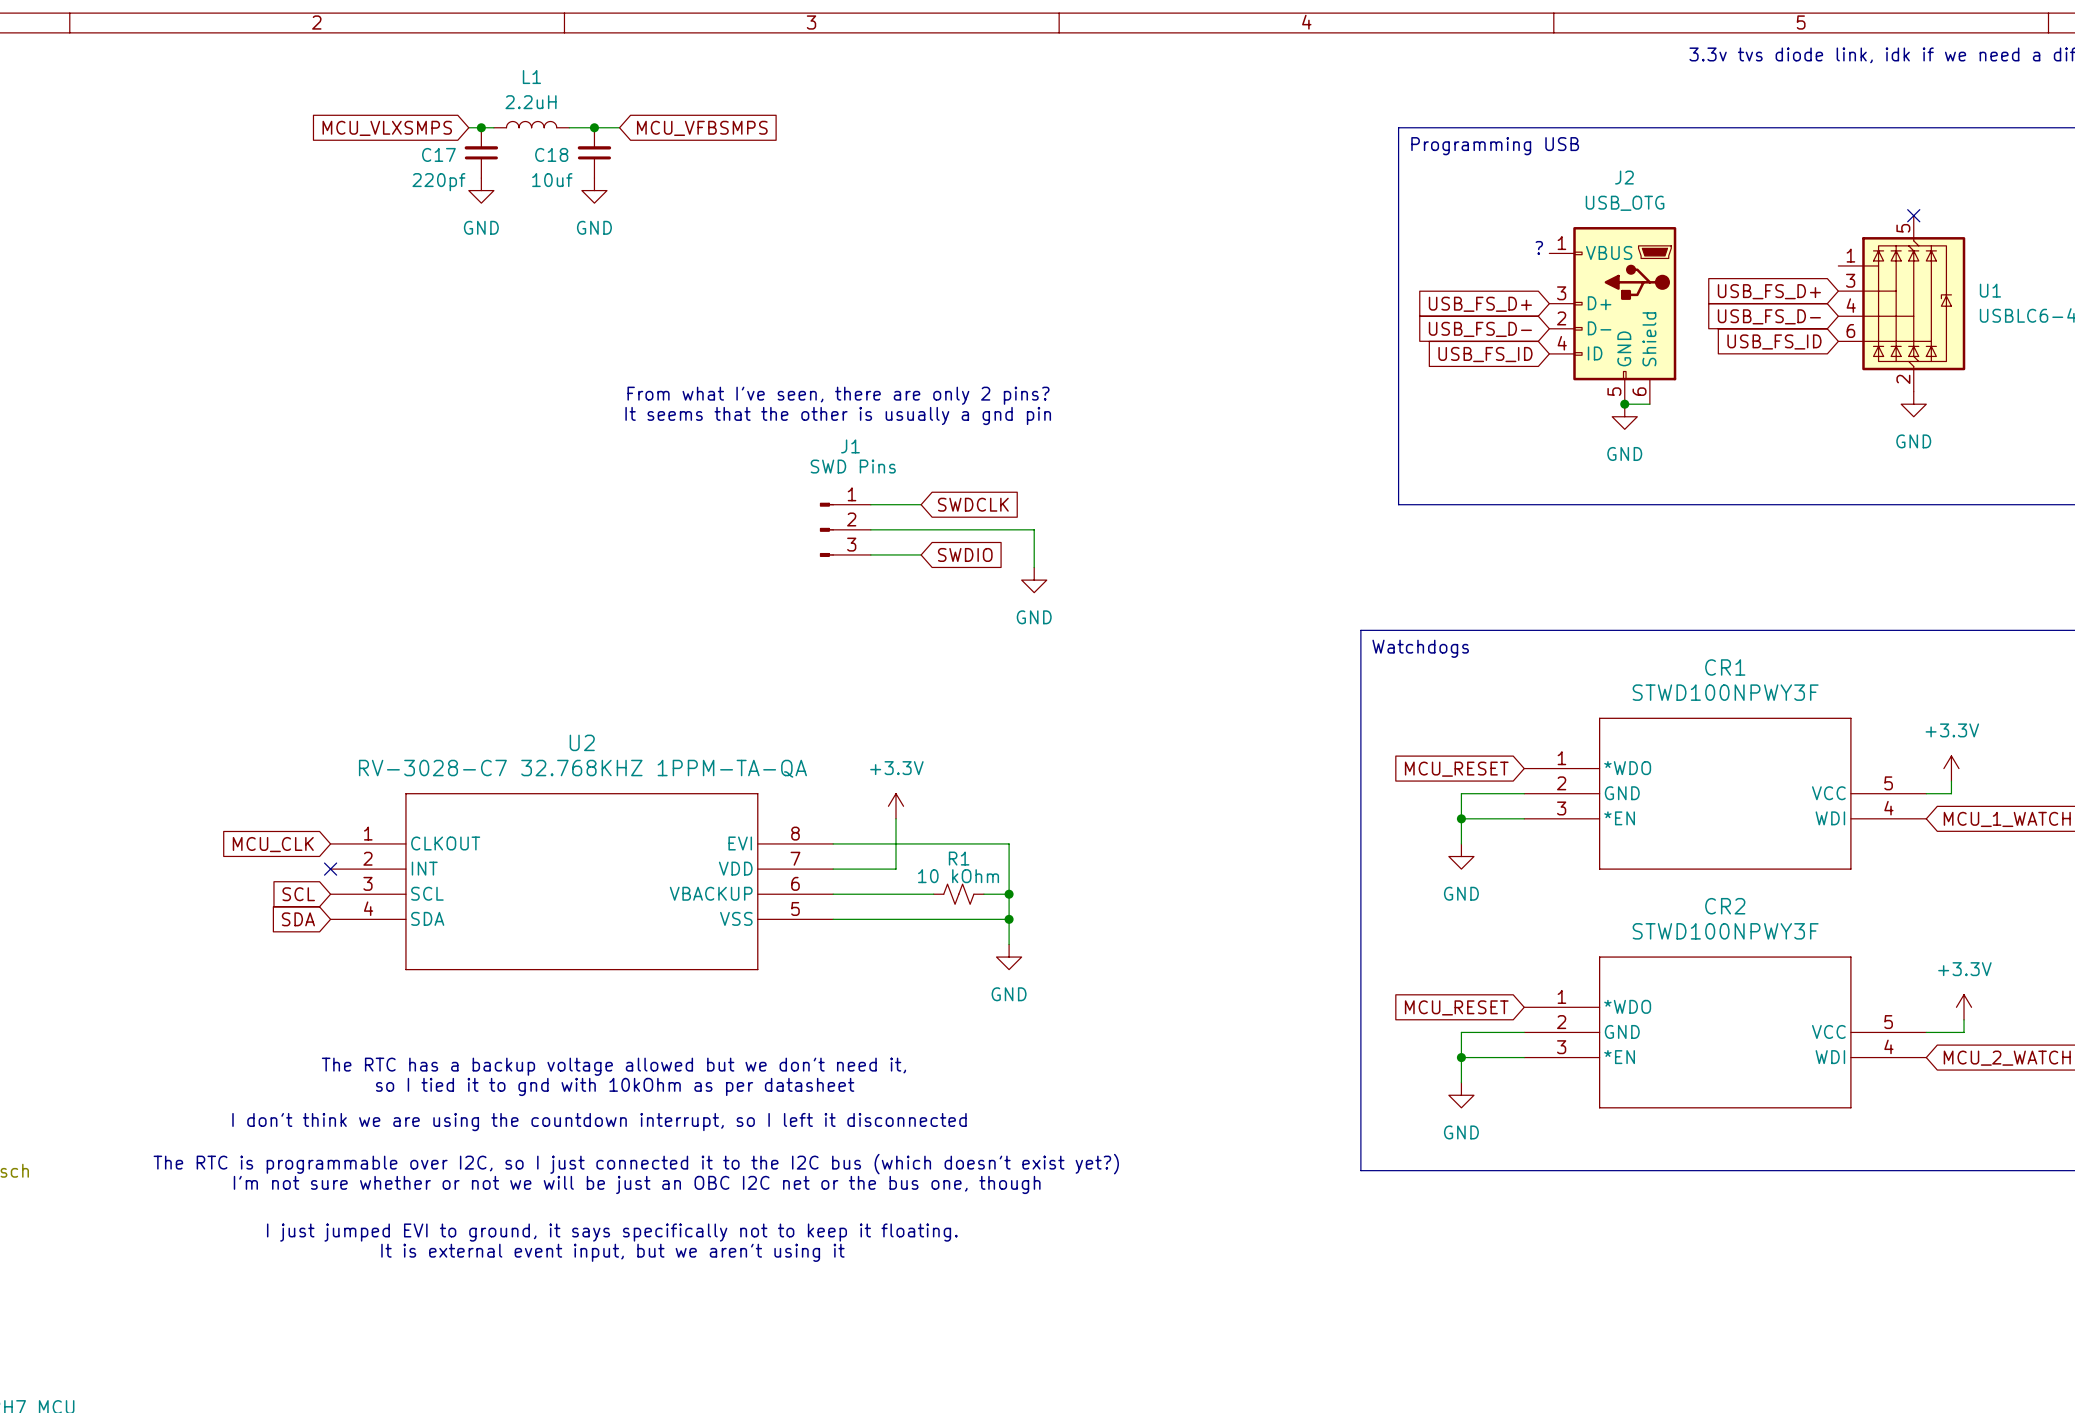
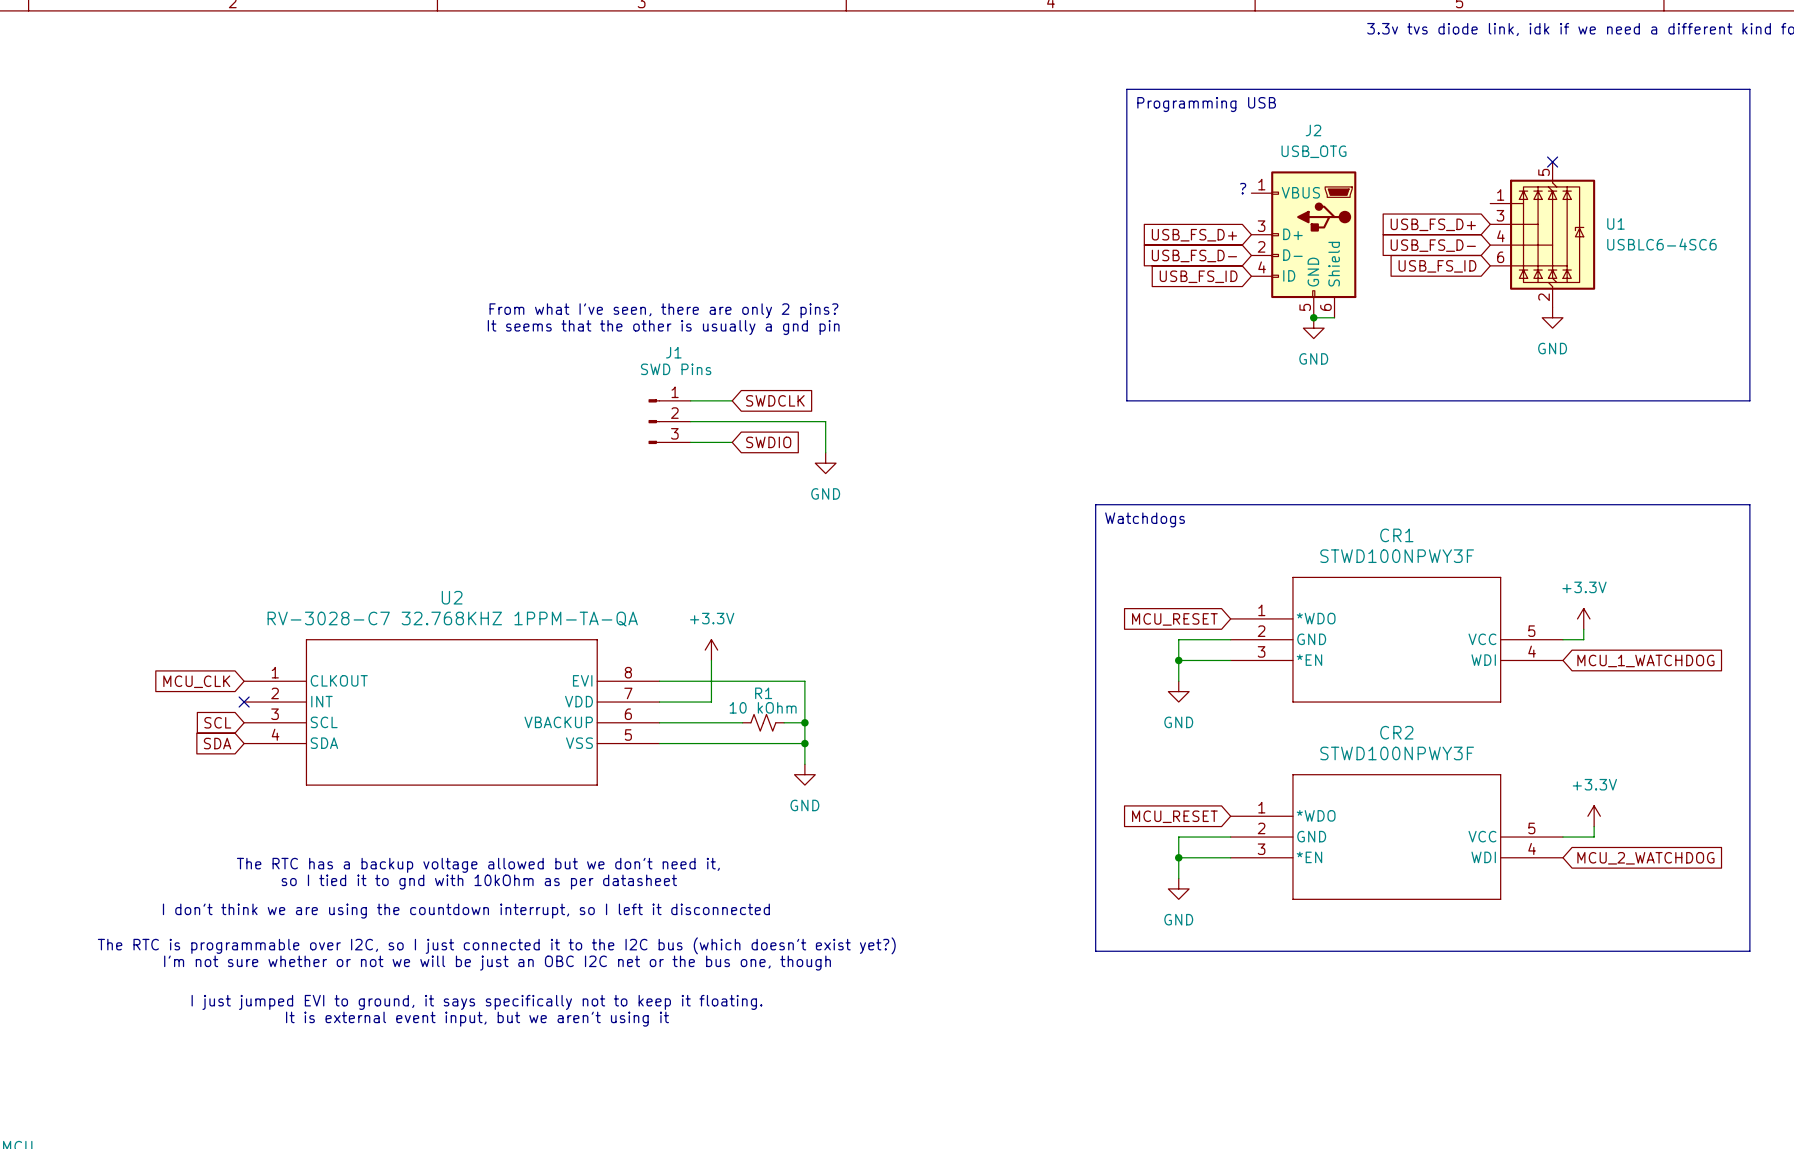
L1: 2.2uH (531, 124) -> none
wire: (468, 127) (493, 127) -> none
junction: (481, 127) -> none
wire: (569, 127) (619, 127) -> none
junction: (594, 127) -> none
global label: MCU_VLXSMPS (387, 128) -> none
global label: MCU_VFBSMPS (702, 128) -> none
C17: 220pf (481, 152) -> none
C18: 10uf (594, 152) -> none
power symbol: GND (481, 190) -> none
power symbol: GND (594, 190) -> none

